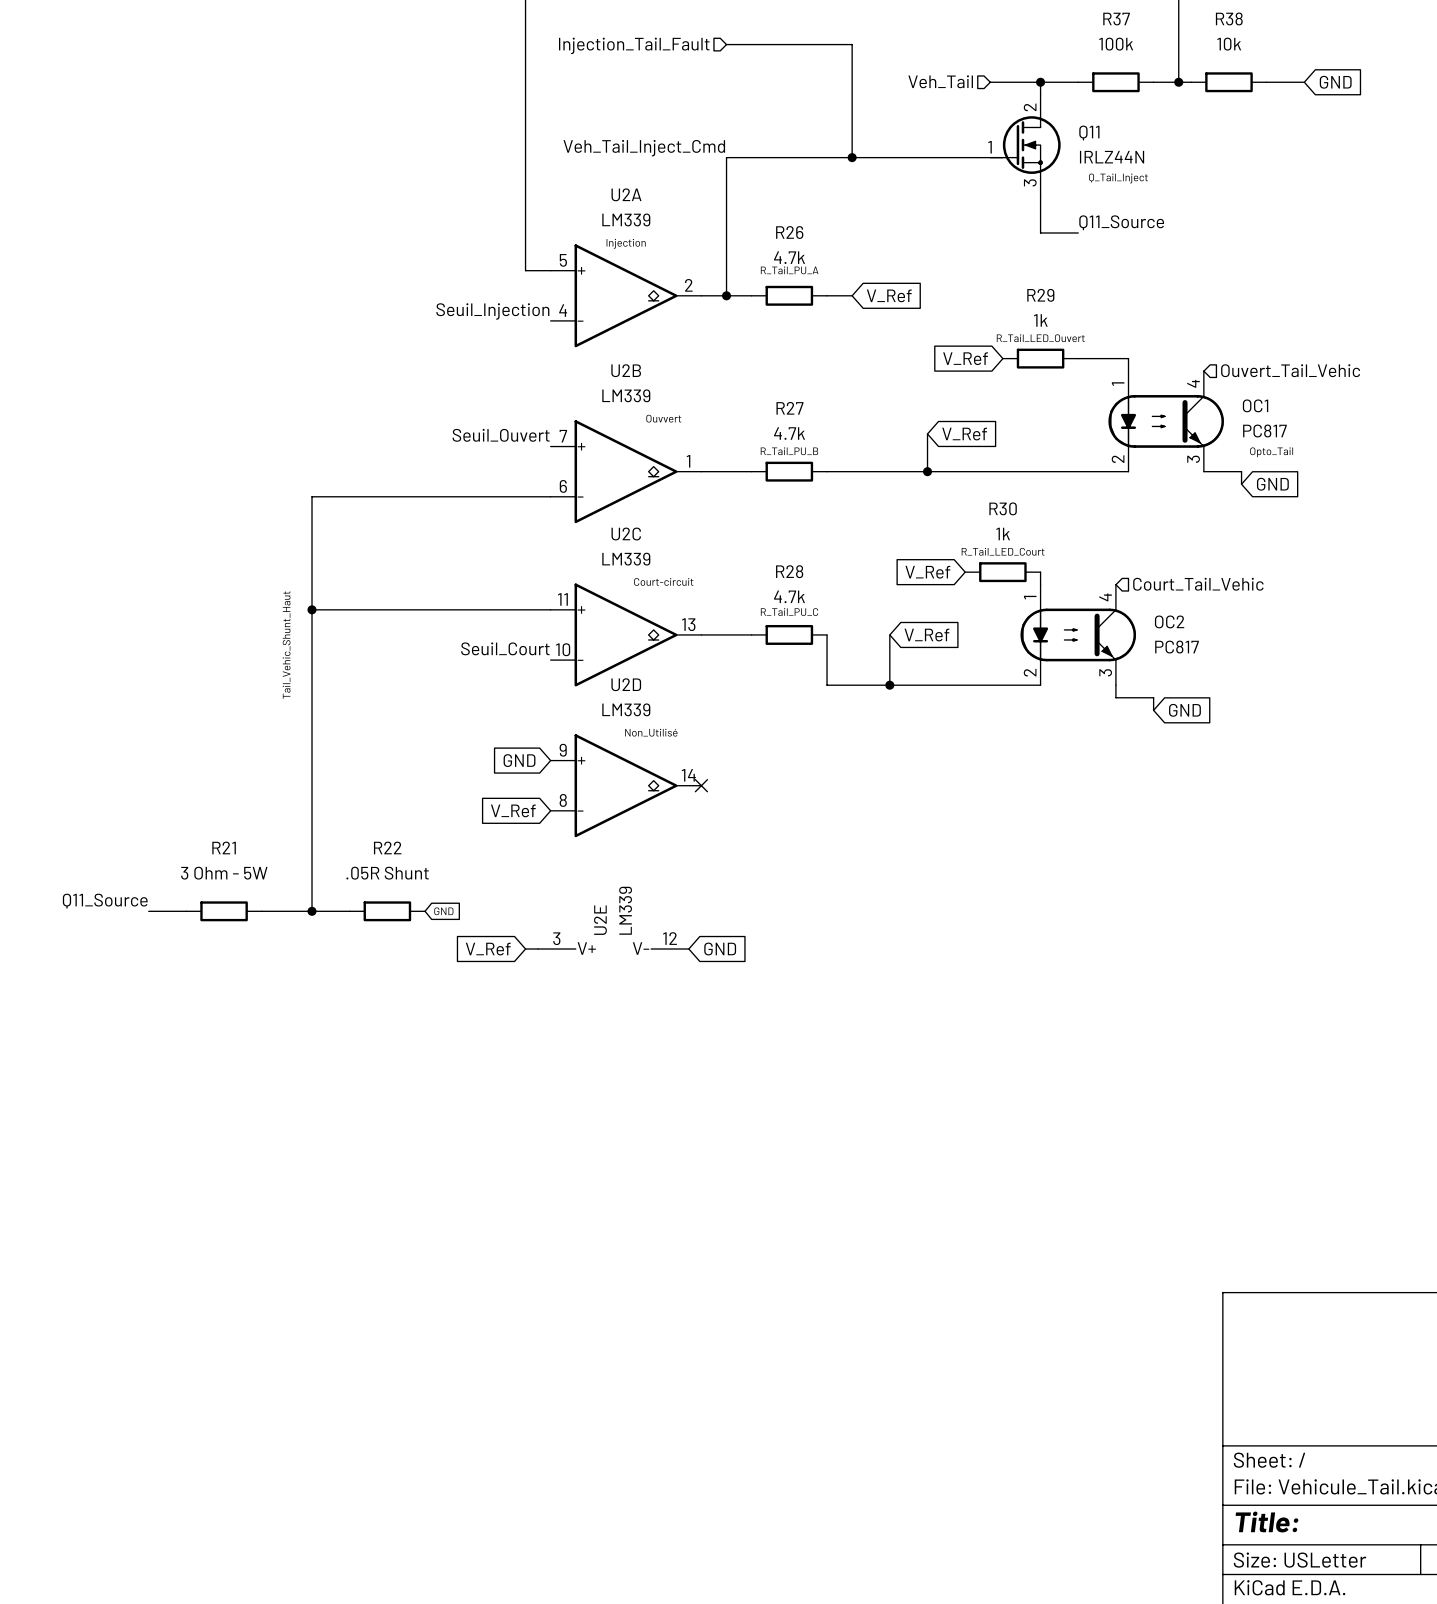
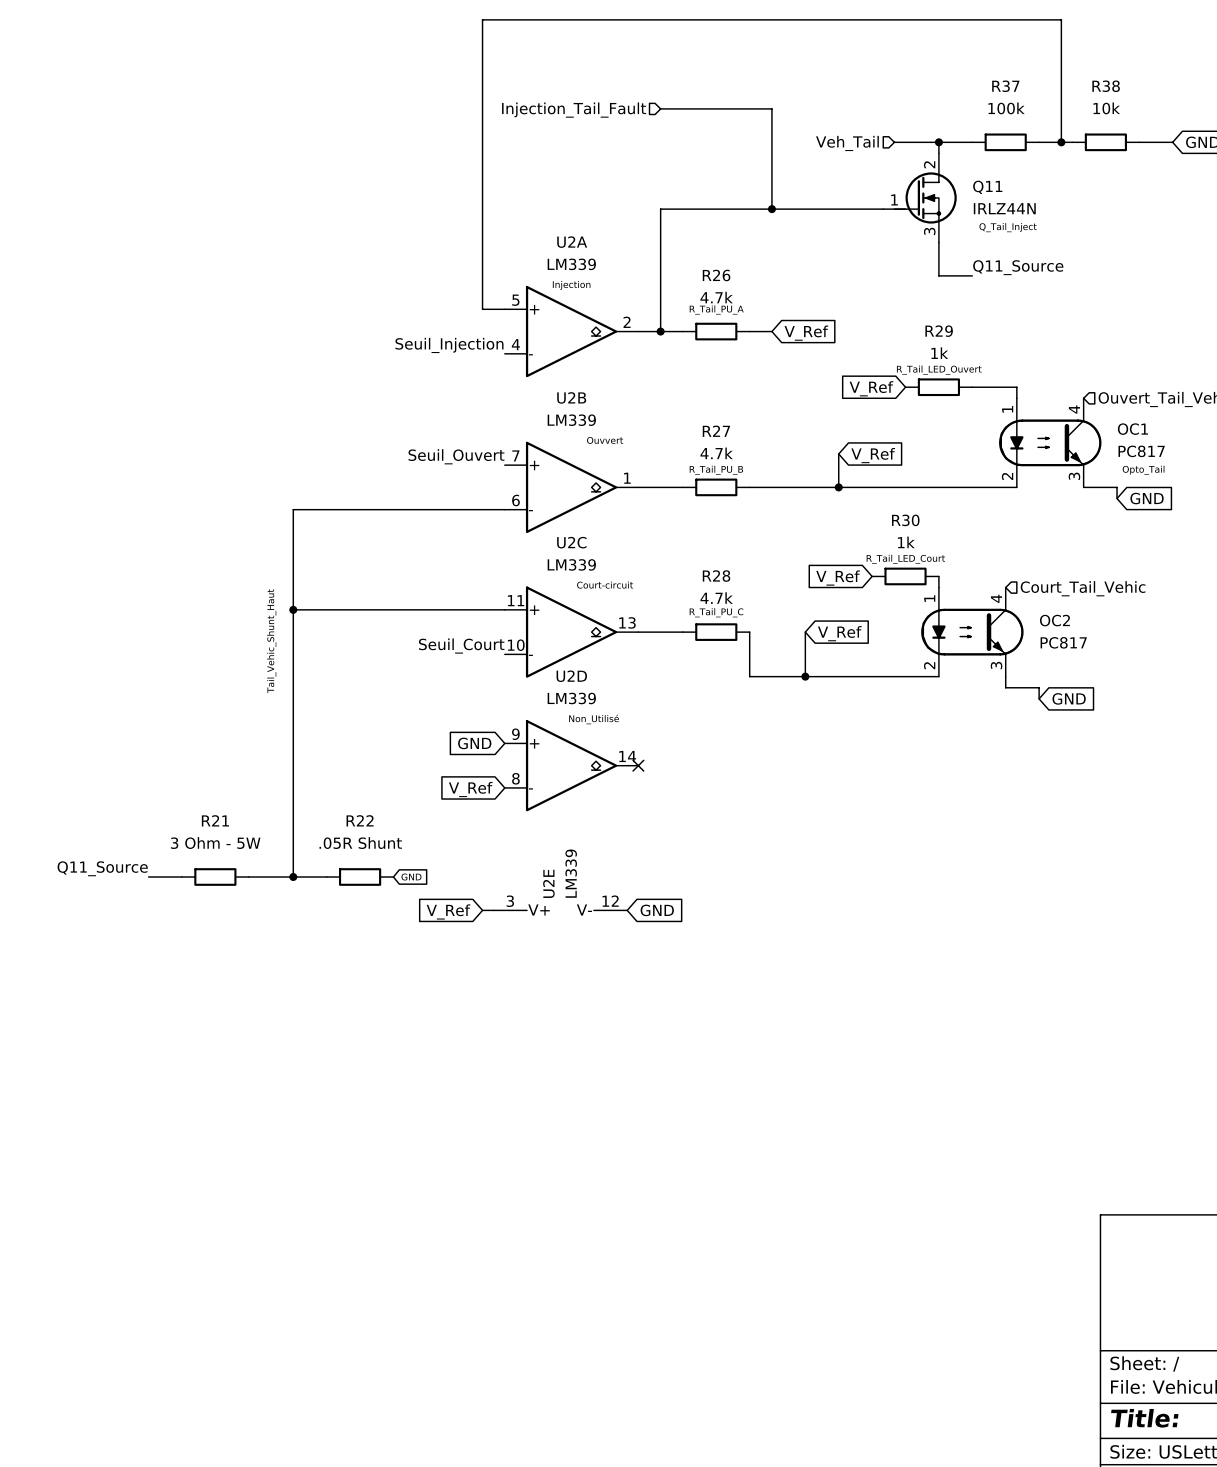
label: Veh_Tail_Inject_Cmd (644, 148) -> none

